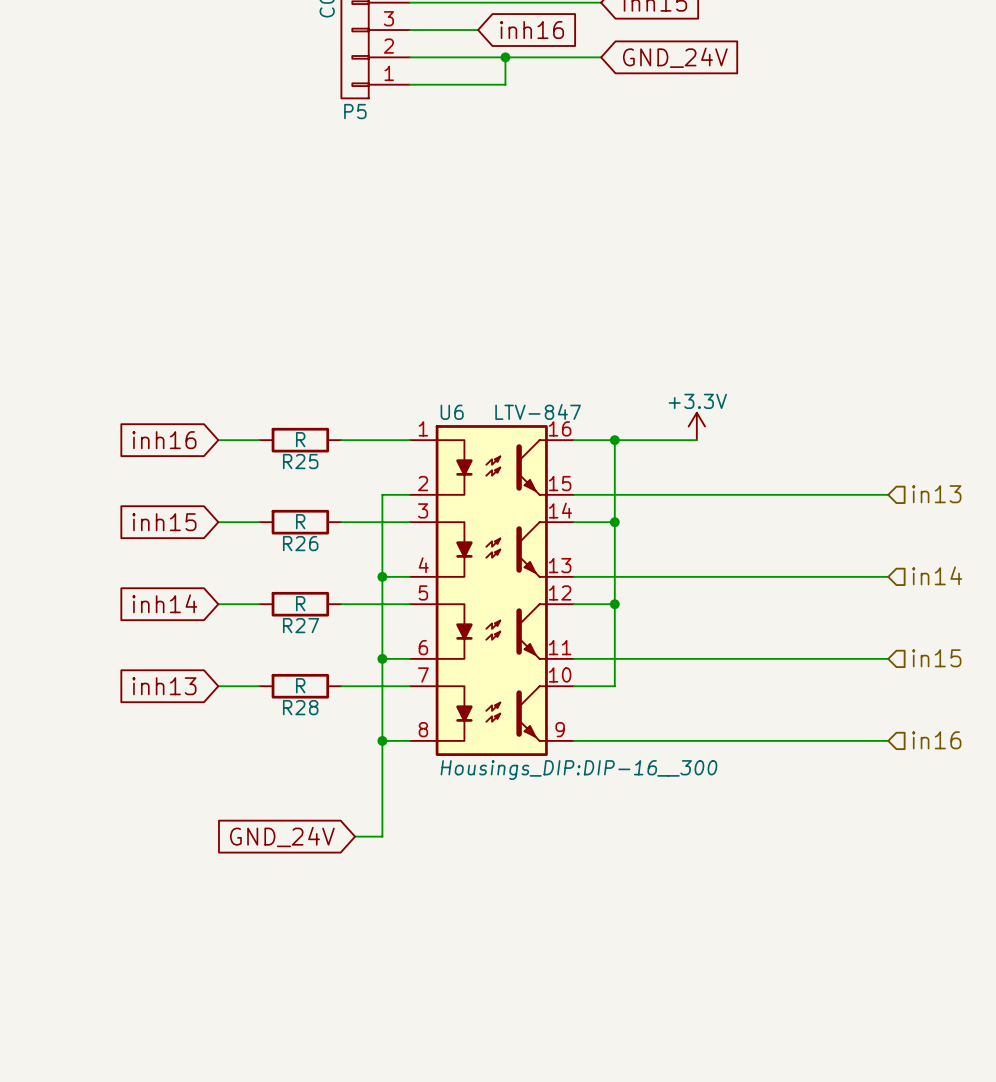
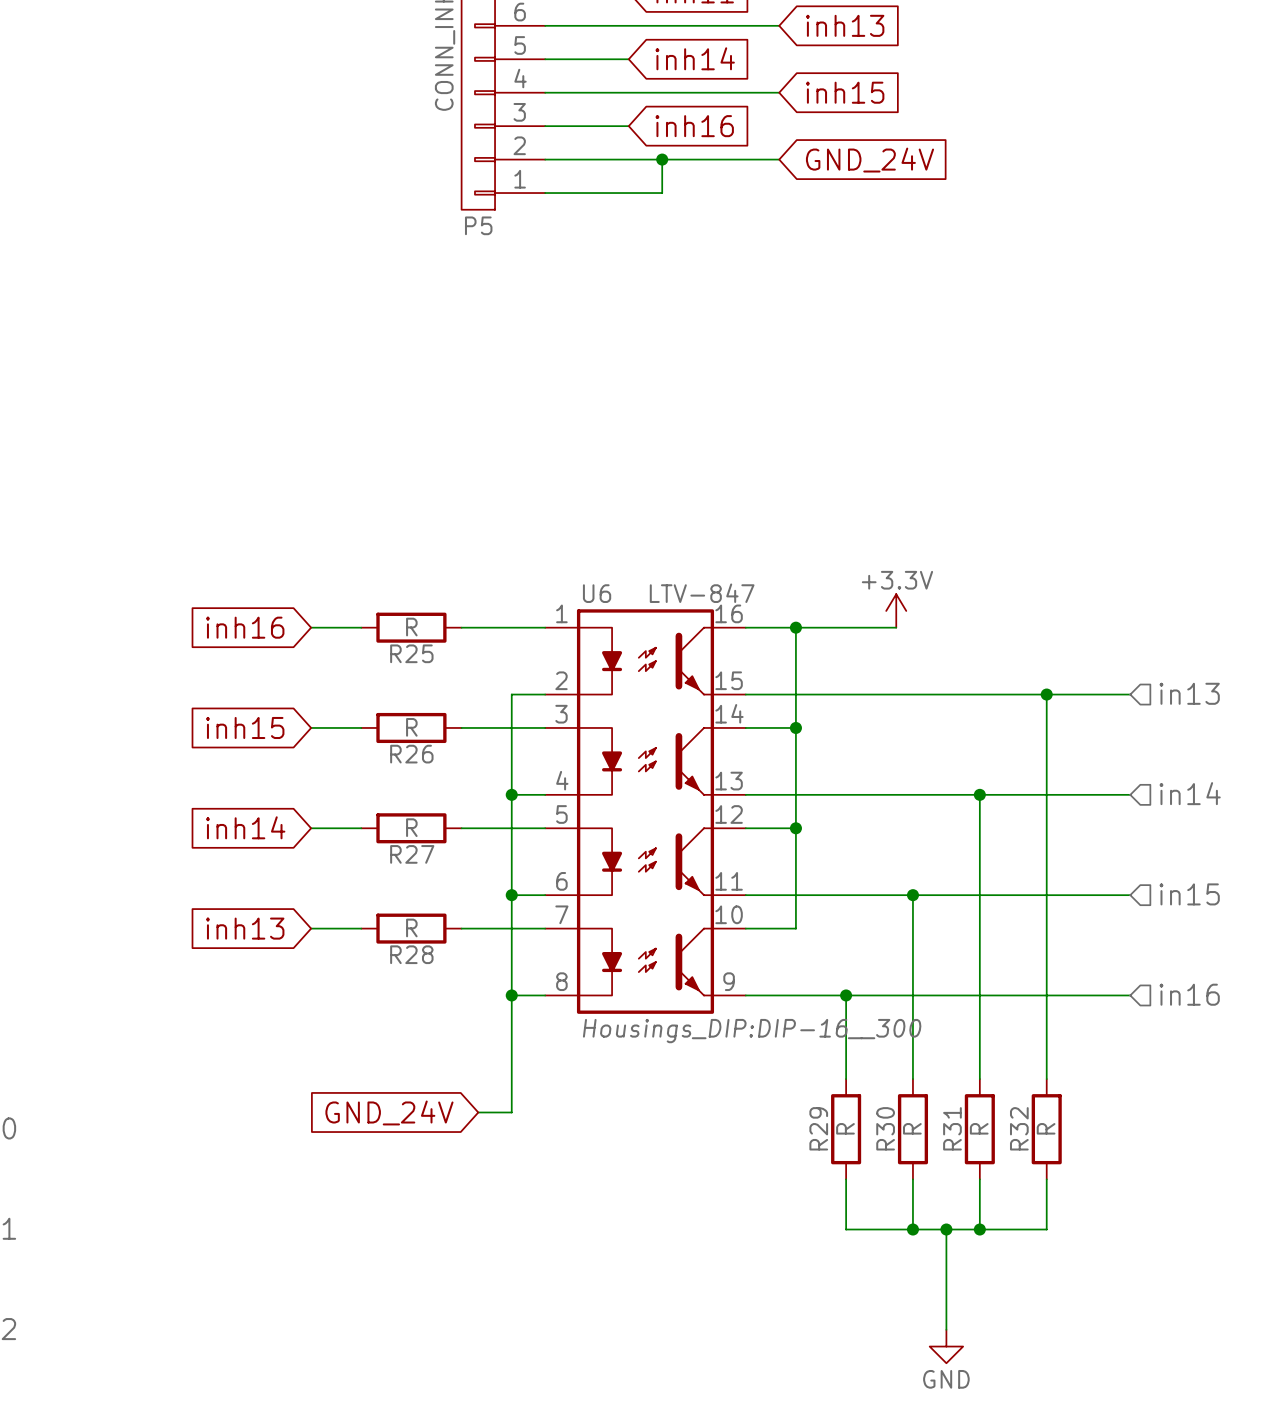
wire: none -> (1046, 694) (1046, 1079)
junction: none -> (1046, 694)
wire: none -> (979, 794) (979, 1079)
junction: none -> (979, 794)
wire: none -> (912, 895) (912, 1079)
junction: none -> (912, 895)
wire: none -> (846, 995) (846, 1079)
junction: none -> (846, 995)
R29: none -> R (846, 1129)
R30: none -> R (912, 1129)
R31: none -> R (979, 1129)
R32: none -> R (1046, 1129)
wire: none -> (846, 1179) (846, 1229) (1046, 1229) (1046, 1179)
wire: none -> (912, 1179) (912, 1229)
wire: none -> (979, 1179) (979, 1229)
junction: none -> (912, 1229)
wire: none -> (946, 1229) (946, 1329)
junction: none -> (946, 1229)
junction: none -> (979, 1229)
power symbol: none -> GND (946, 1346)

